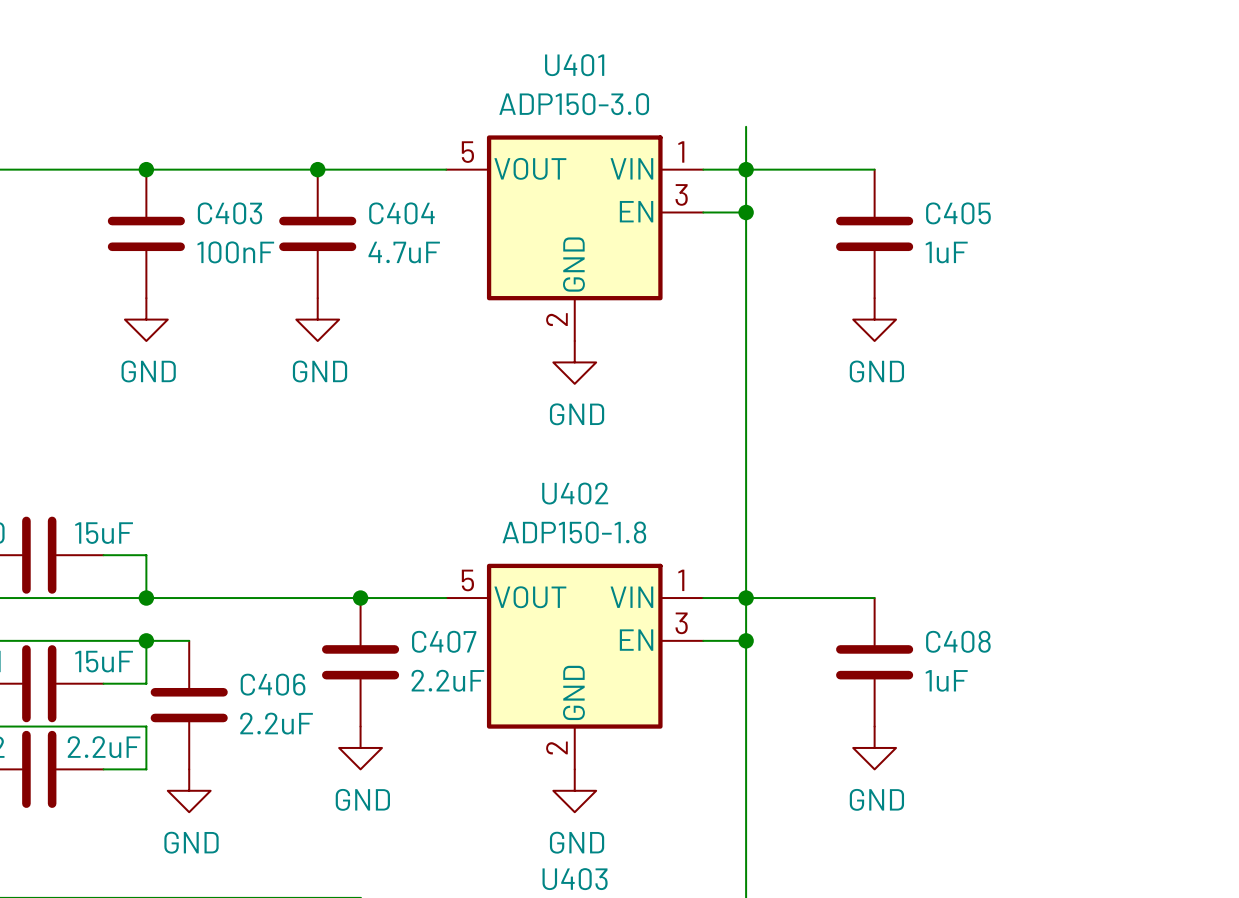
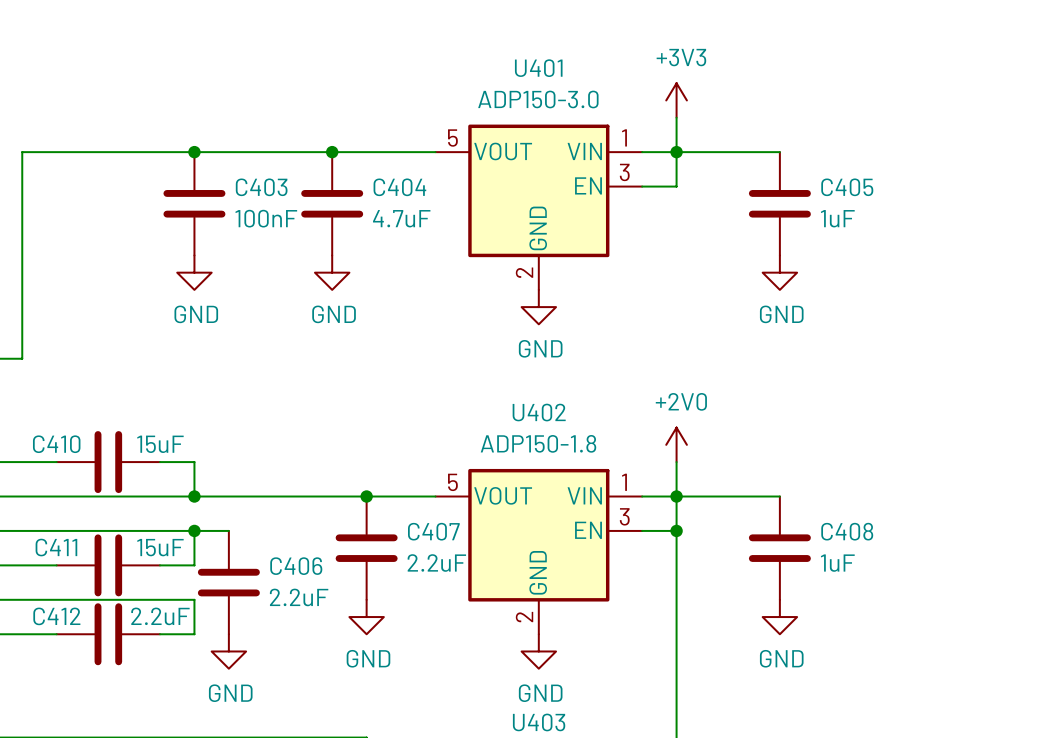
power symbol: none -> +3V3 (676, 100)
wire: (746, 212) (746, 555) -> none
junction: (746, 212) -> none
power symbol: none -> +2V0 (676, 444)

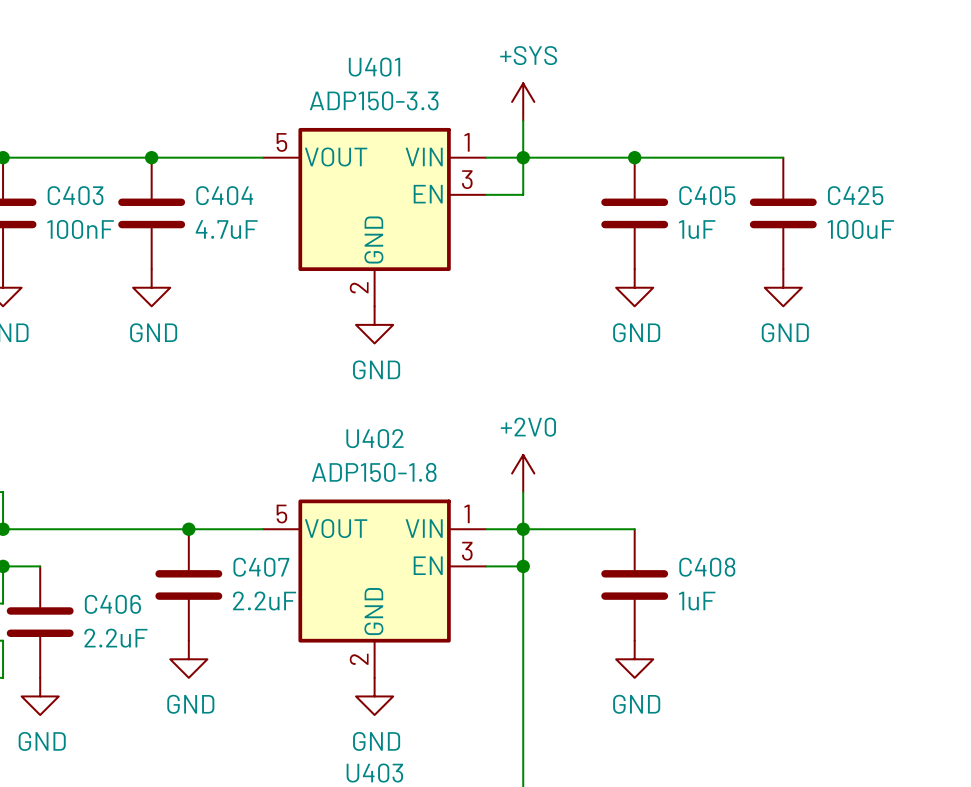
U401 value: ADP150-3.0 (538, 99) -> ADP150-3.3 (374, 100)
power symbol: +3V3 (676, 100) -> +SYS (523, 101)
wire: none -> (634, 157) (783, 157)
junction: none -> (634, 157)
C425: none -> 100uF (783, 213)
power symbol: none -> GND (783, 287)

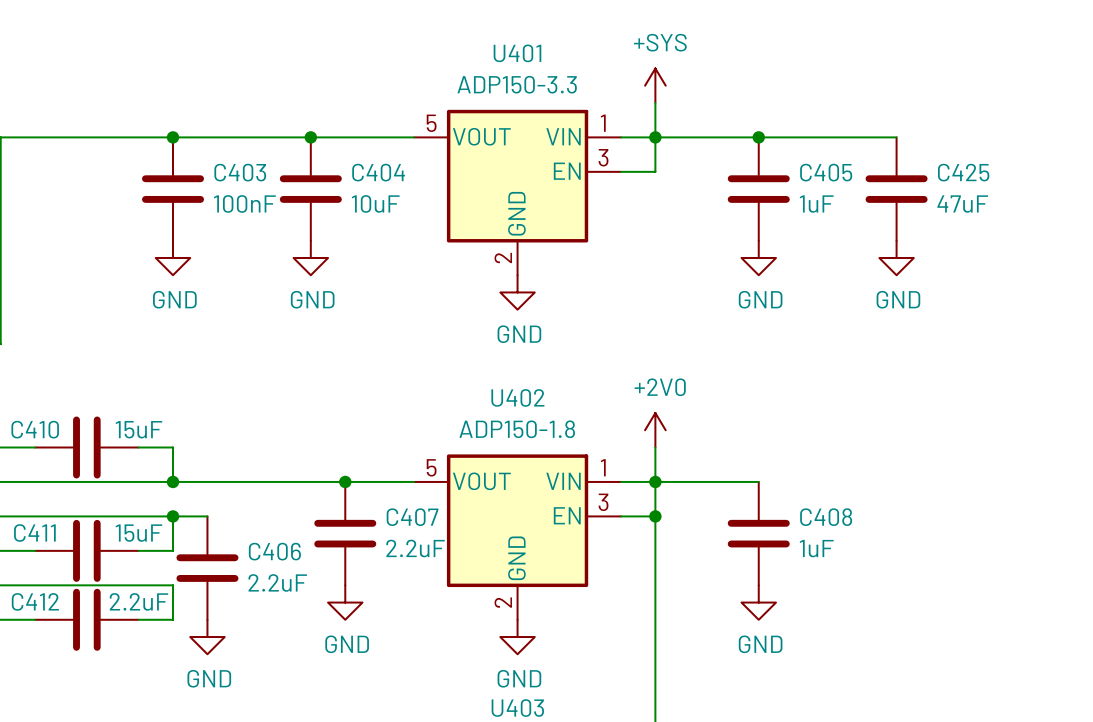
C404 value: 4.7uF (226, 229) -> 10uF (375, 203)
C425 value: 100uF (860, 229) -> 47uF (962, 204)

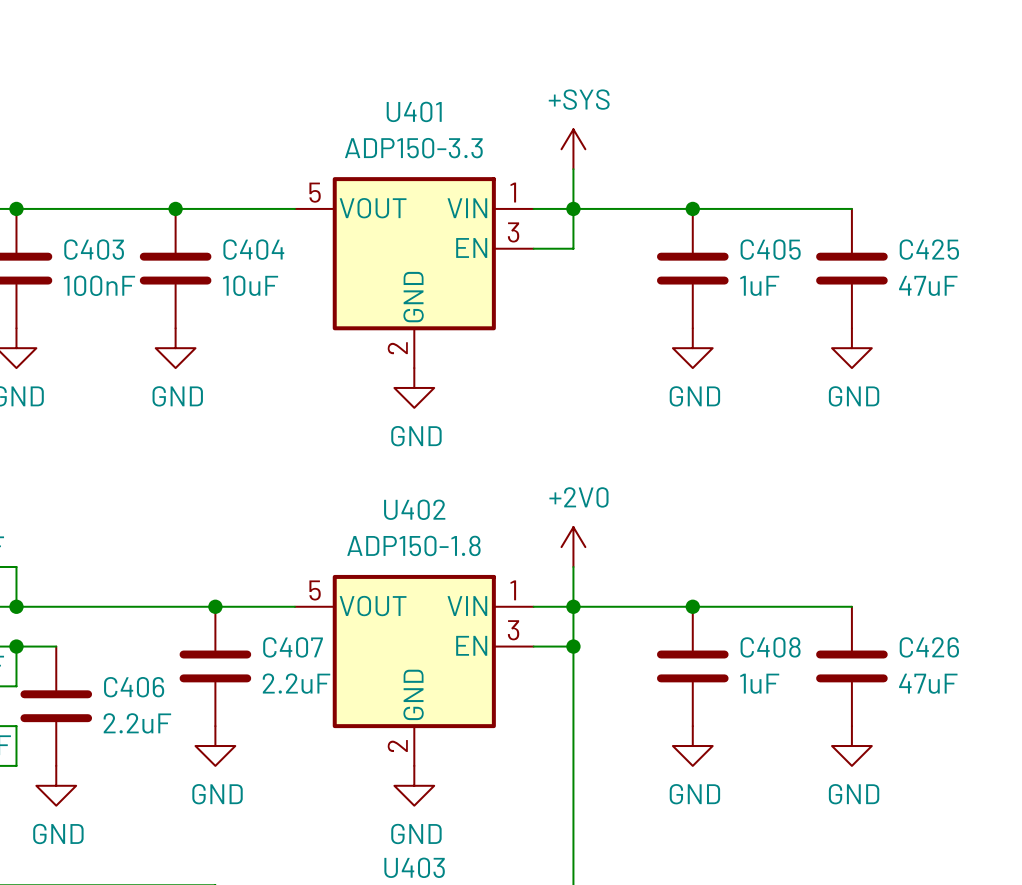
wire: none -> (692, 606) (851, 606)
junction: none -> (692, 606)
C426: none -> 47uF (851, 666)
power symbol: none -> GND (851, 746)

